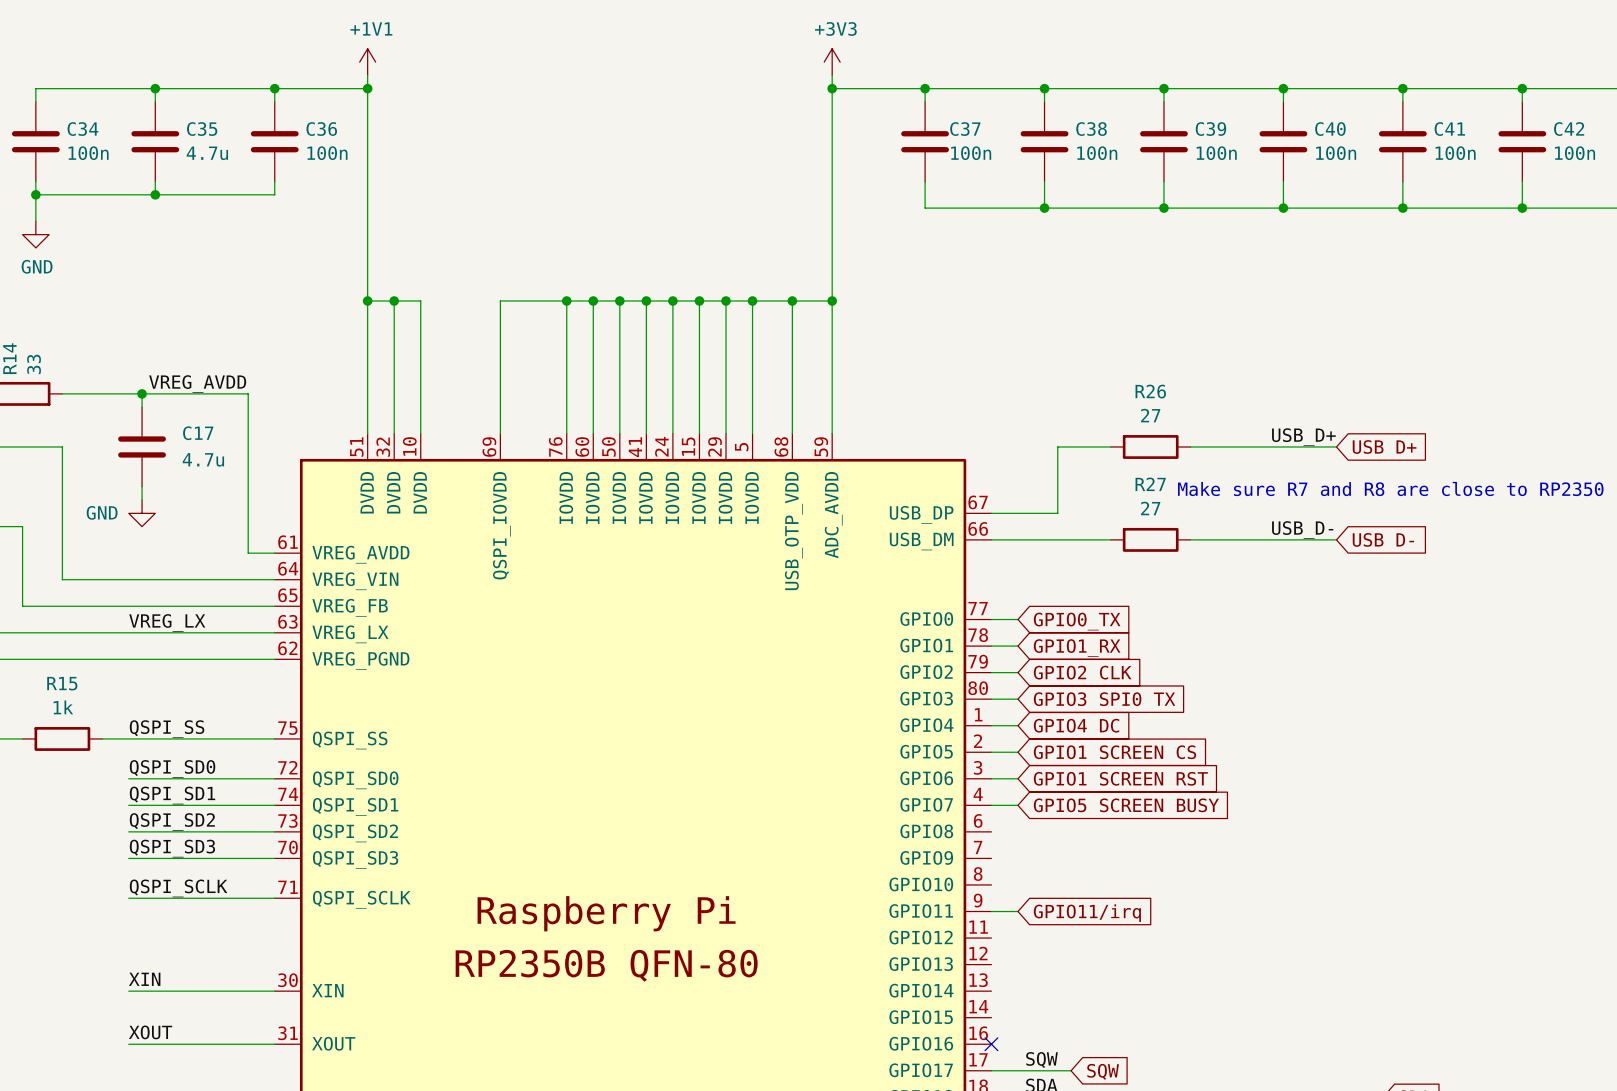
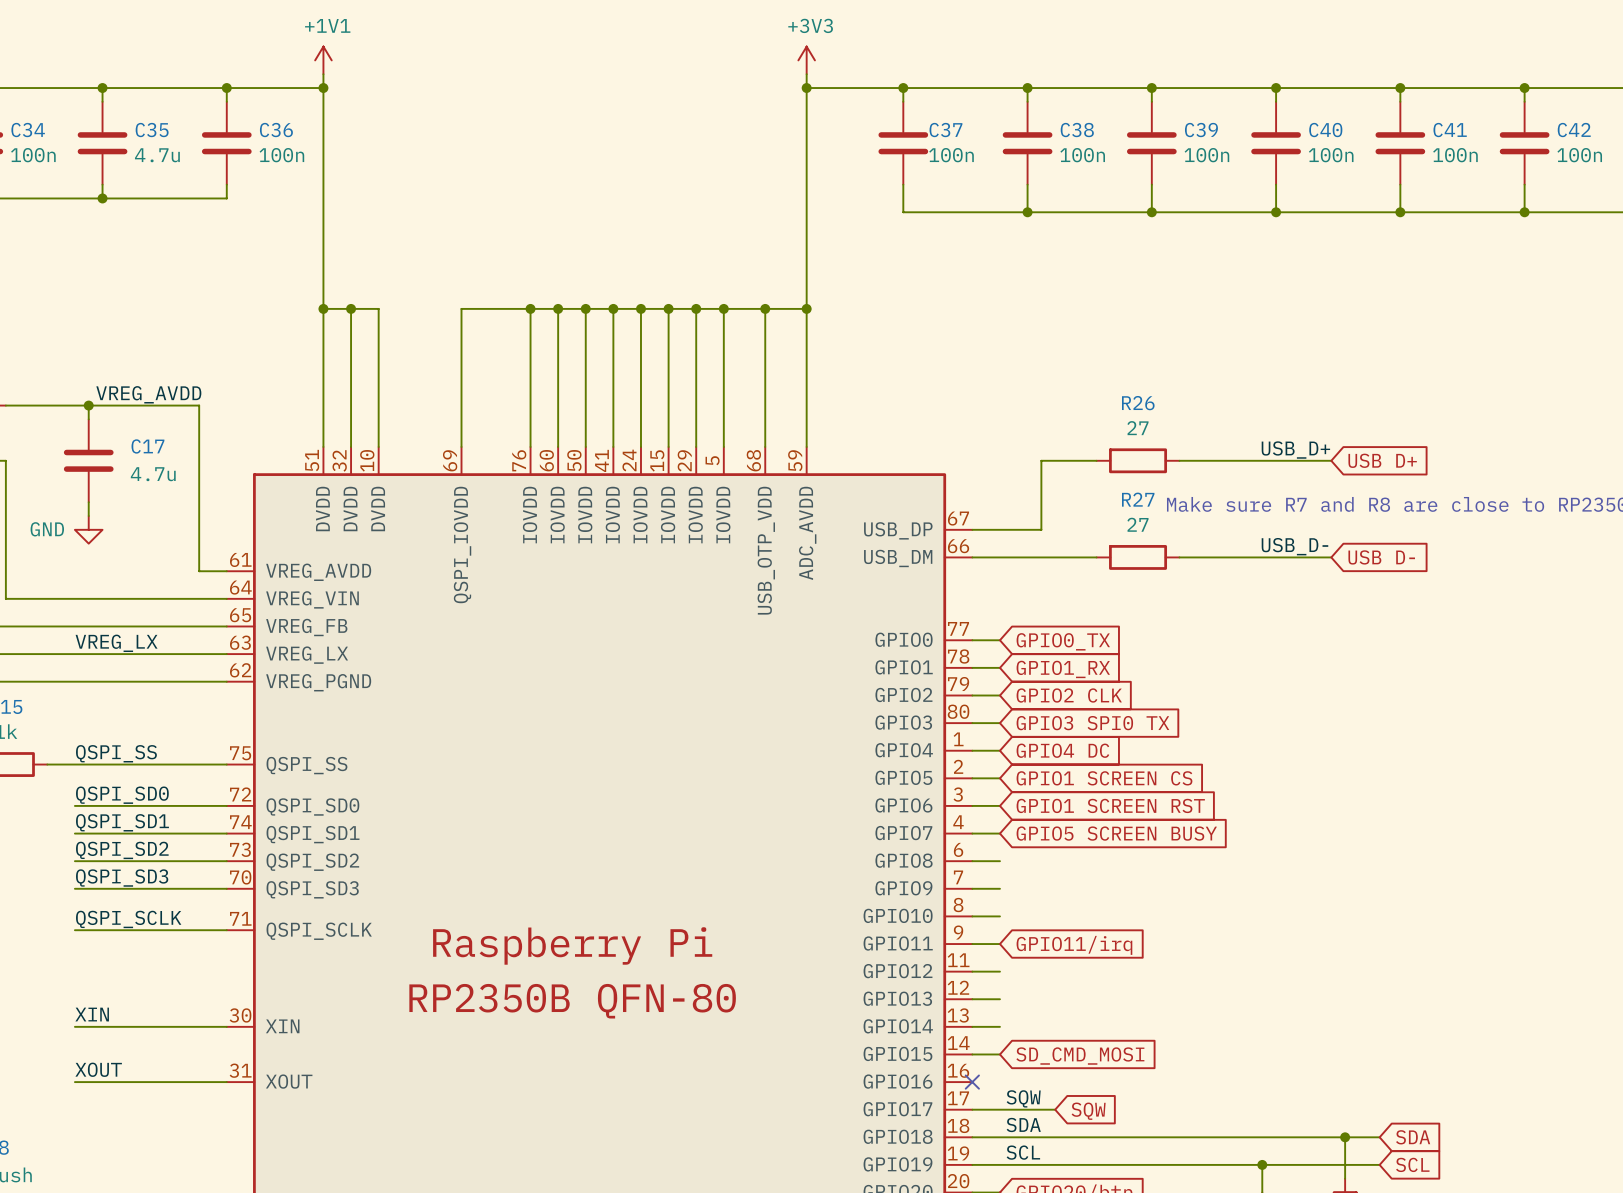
wire: none -> (972, 861) (999, 861)
wire: none -> (972, 888) (999, 888)
wire: none -> (972, 916) (999, 916)
wire: none -> (972, 971) (999, 971)
wire: none -> (972, 999) (999, 999)
wire: none -> (972, 1026) (999, 1026)
wire: none -> (972, 1054) (999, 1054)
global label: none -> SD_CMD_MOSI (1080, 1056)

